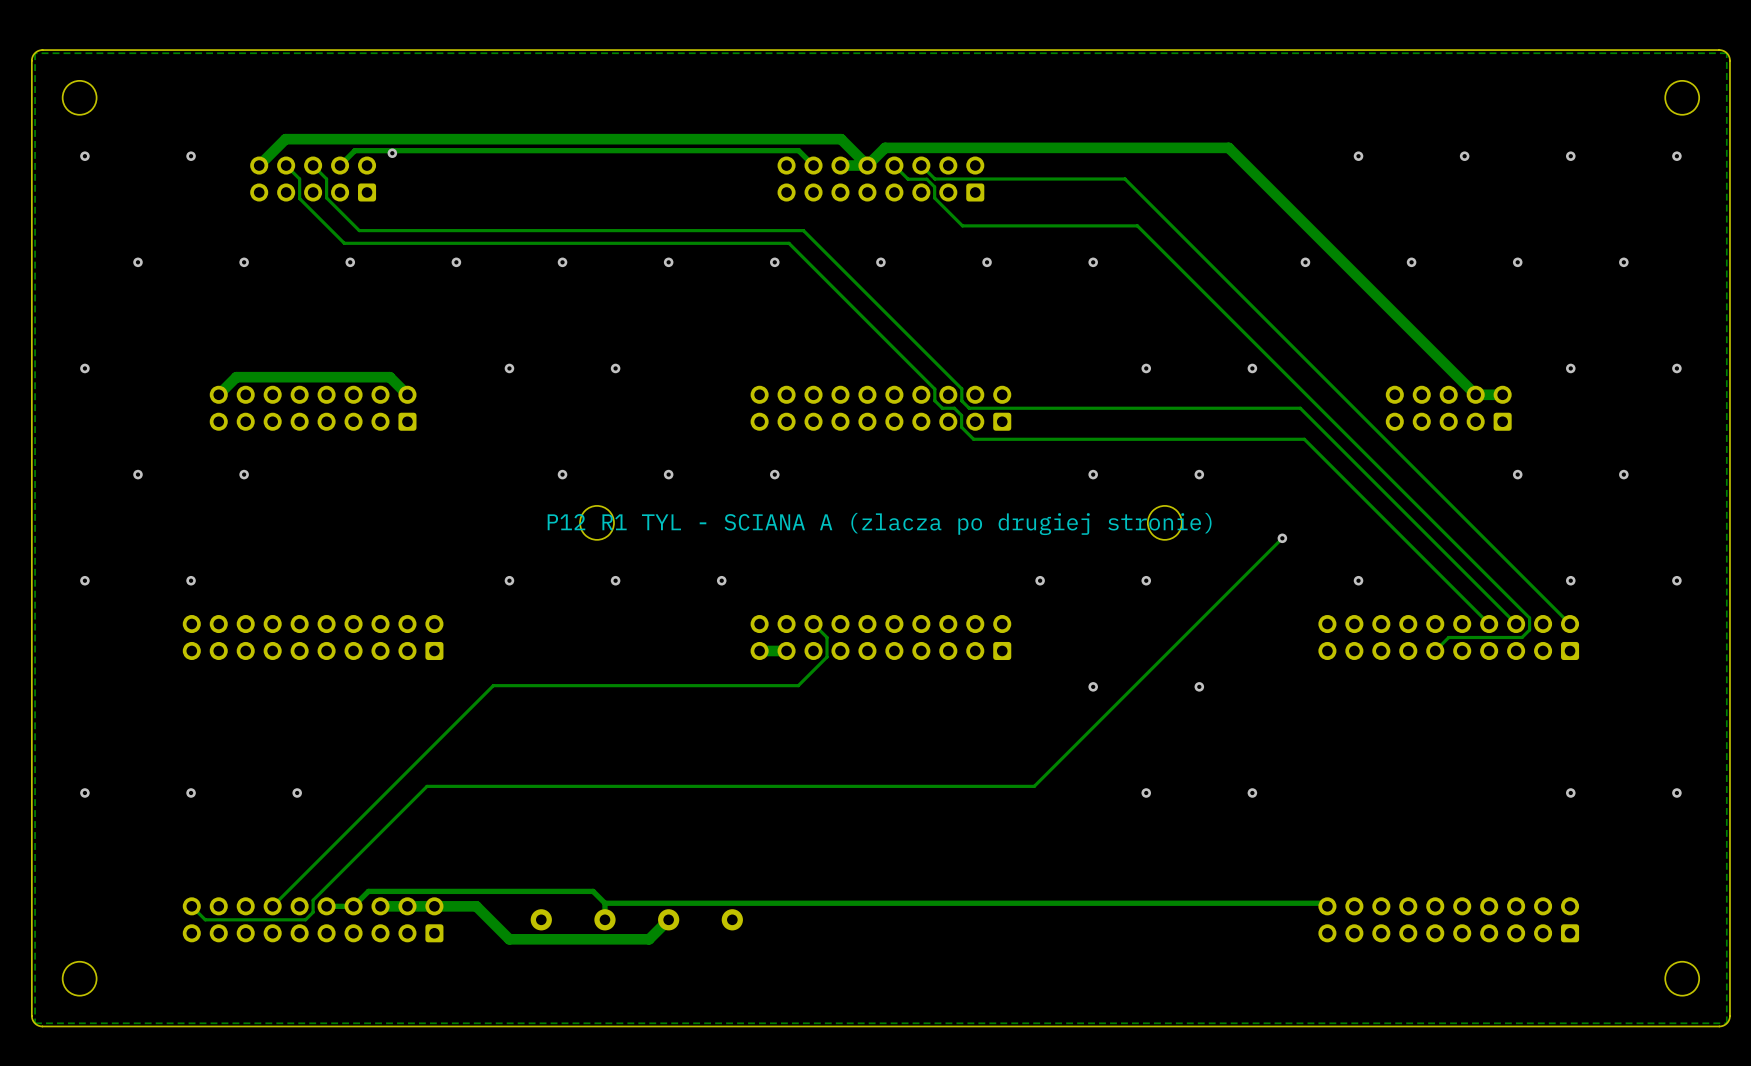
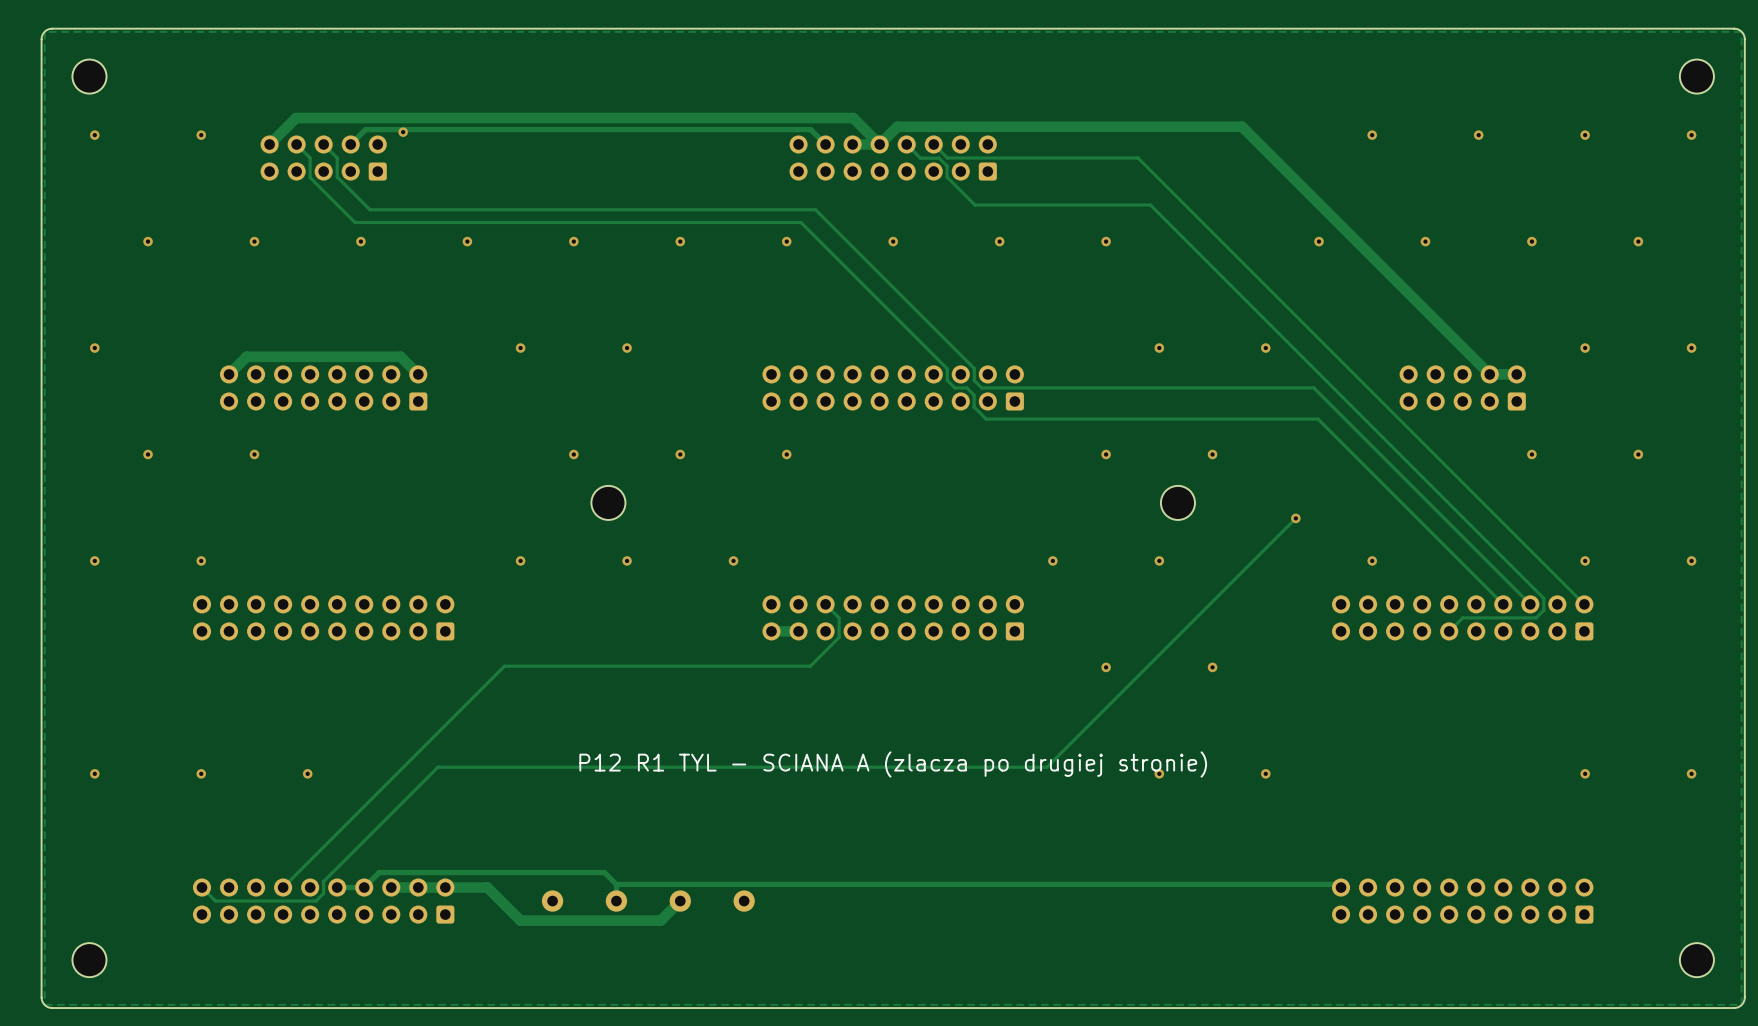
text position: P12 R1 TYL - SCIANA A (zlacza po drugiej stronie) (879, 524) -> P12 R1 TYL - SCIANA A (zlacza po drugiej stronie) (893, 764)

